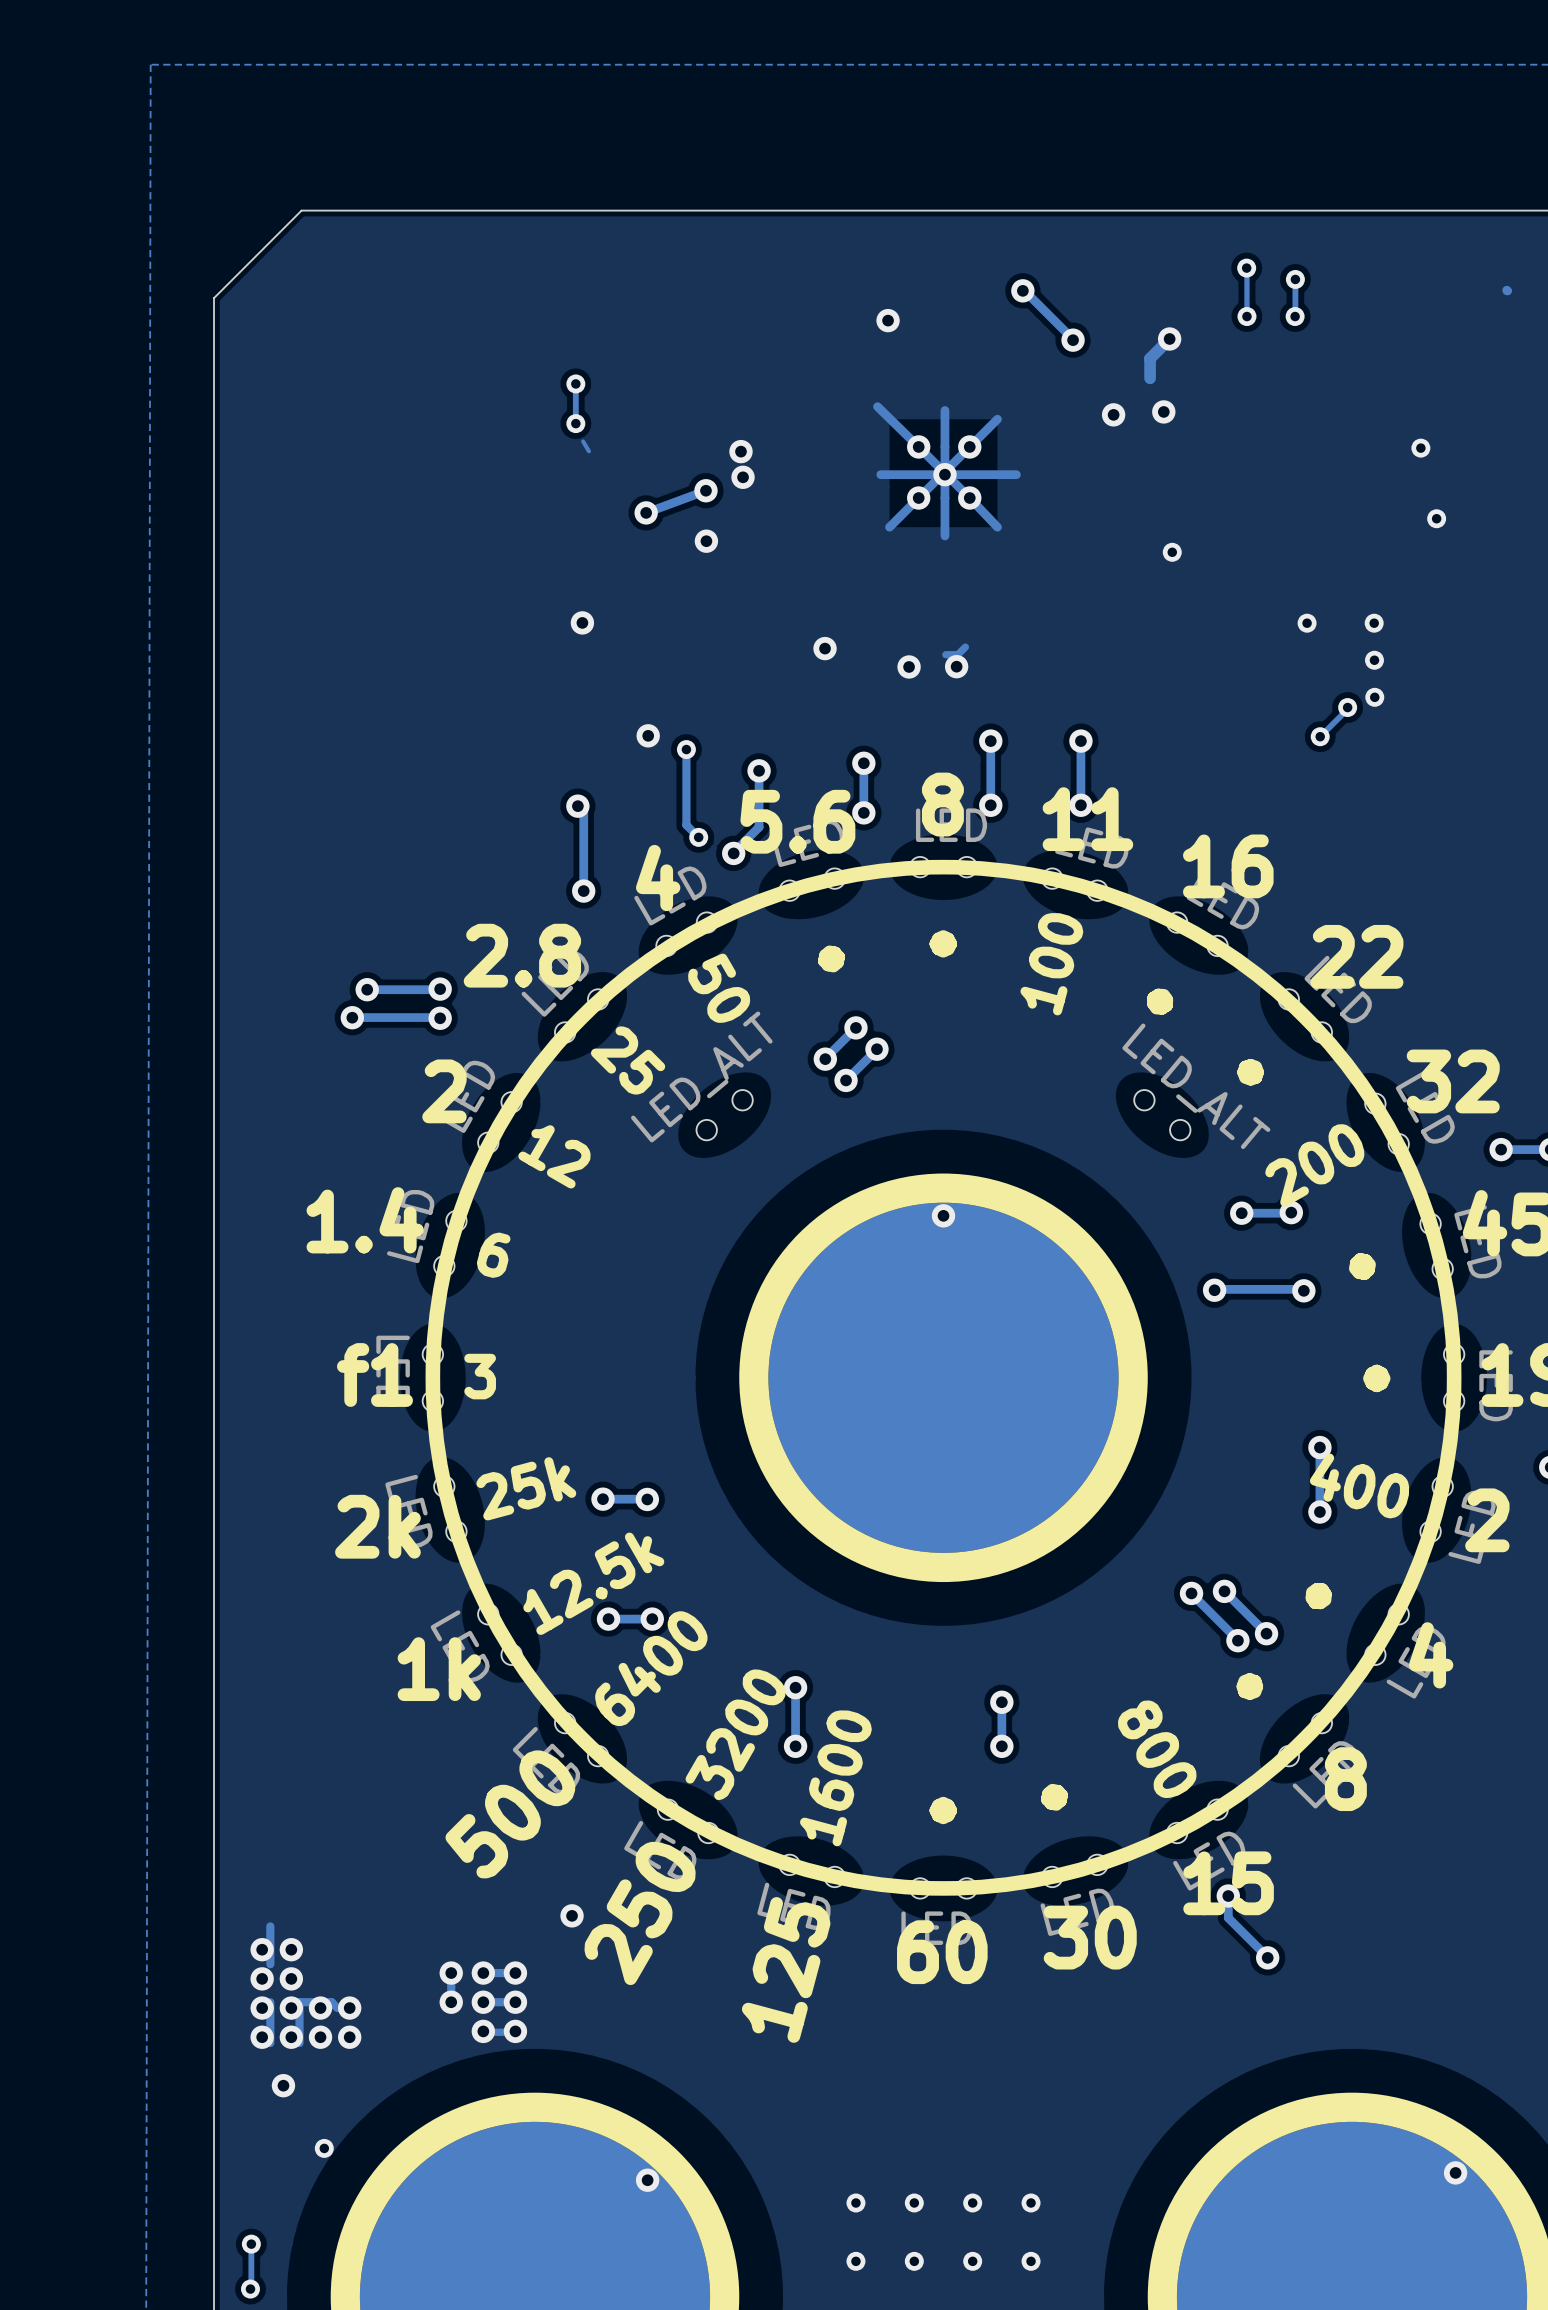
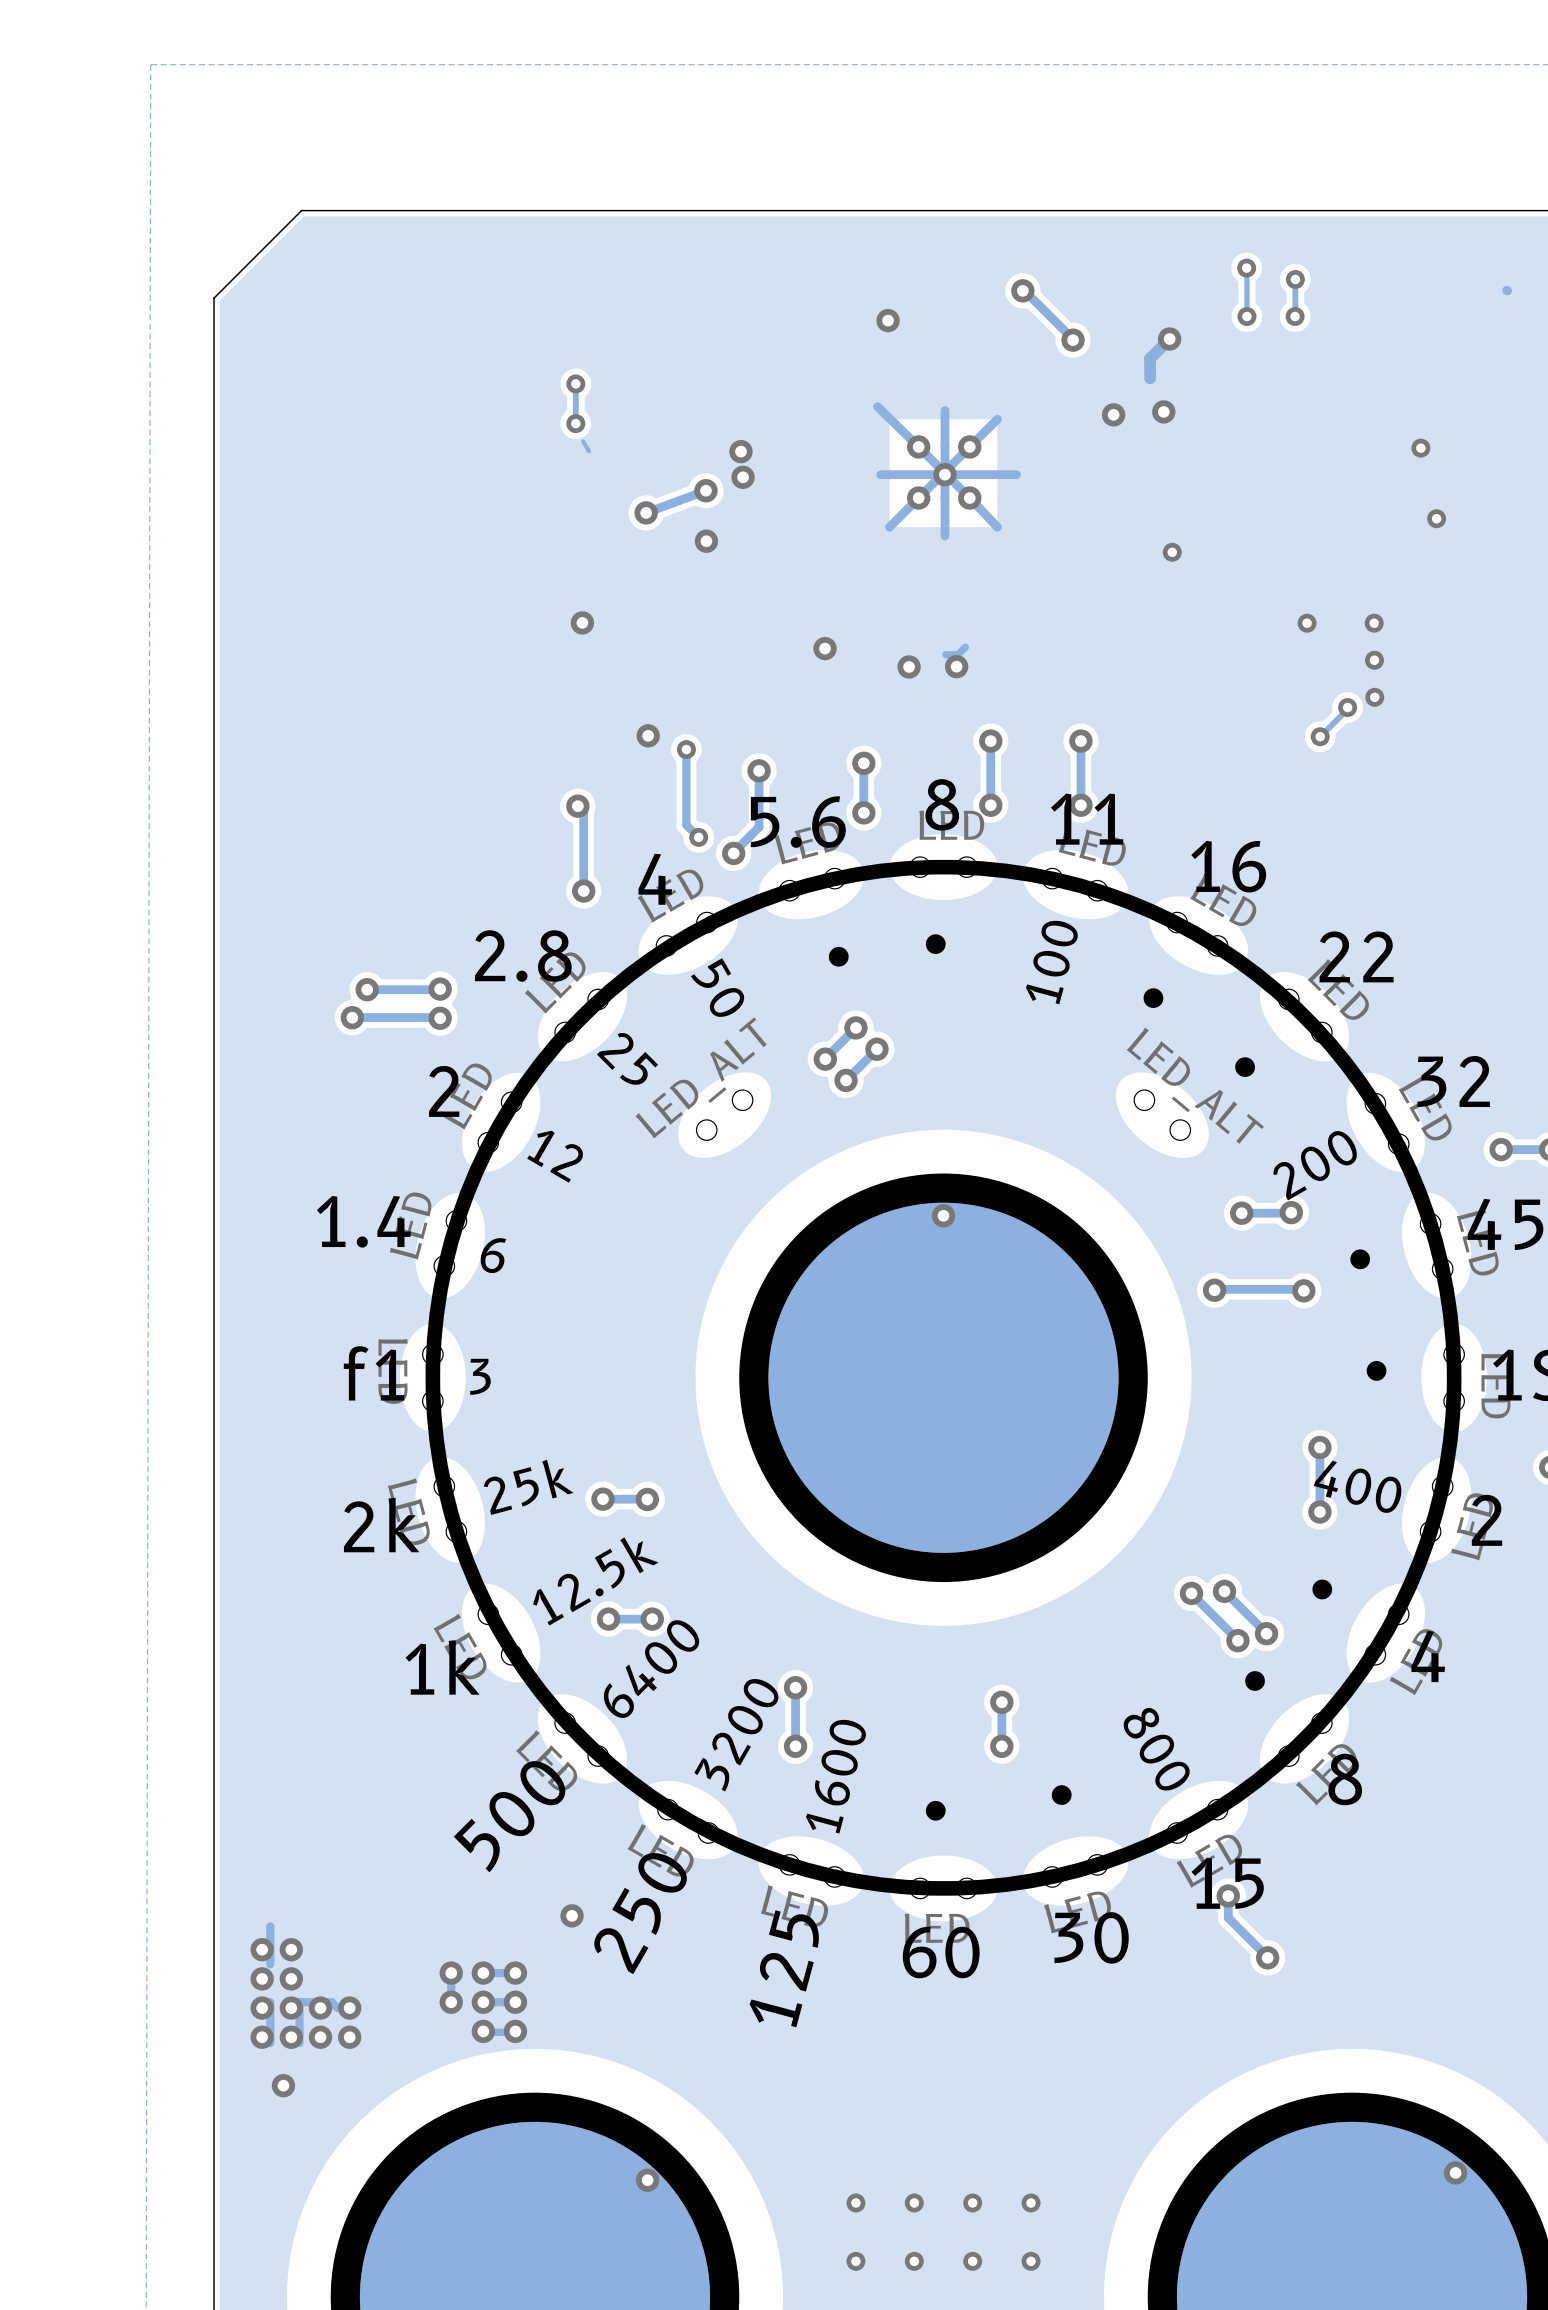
via: (324, 2148) -> none
track: (251, 2244) (250, 2289) -> none
via: (251, 2244) -> none
via: (250, 2289) -> none

